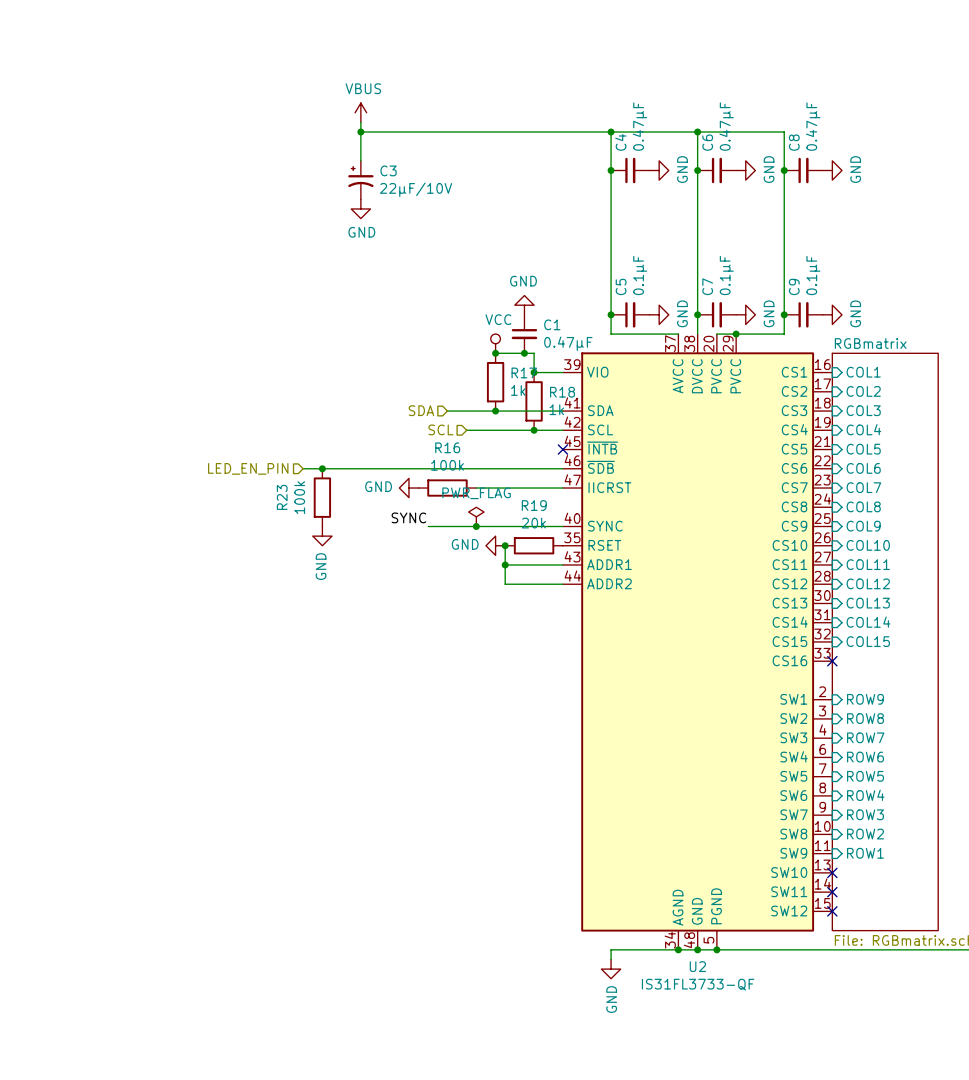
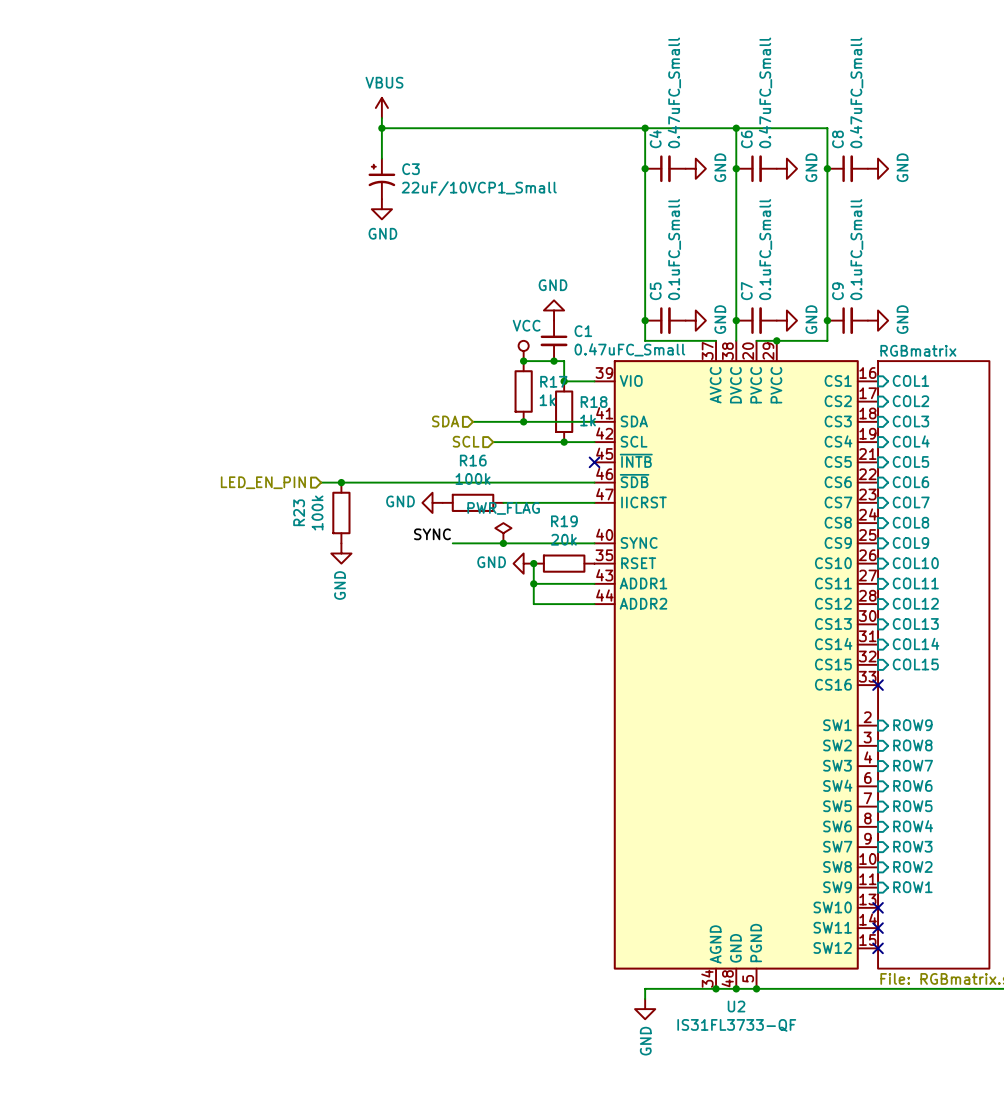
C4 value: 0.47μF (639, 126) -> 0.47uFC_Small (674, 92)
C6 value: 0.47μF (726, 126) -> 0.47uFC_Small (765, 92)
C8 value: 0.47μF (813, 126) -> 0.47uFC_Small (856, 92)
C3 value: 22μF/10V (416, 189) -> 22uF/10VCP1_Small (479, 188)
C5 value: 0.1μF (640, 275) -> 0.1uFC_Small (674, 249)
C7 value: 0.1μF (726, 275) -> 0.1uFC_Small (765, 249)
C9 value: 0.1μF (813, 275) -> 0.1uFC_Small (856, 249)
C1 value: 0.47μF (568, 343) -> 0.47uFC_Small (629, 349)

